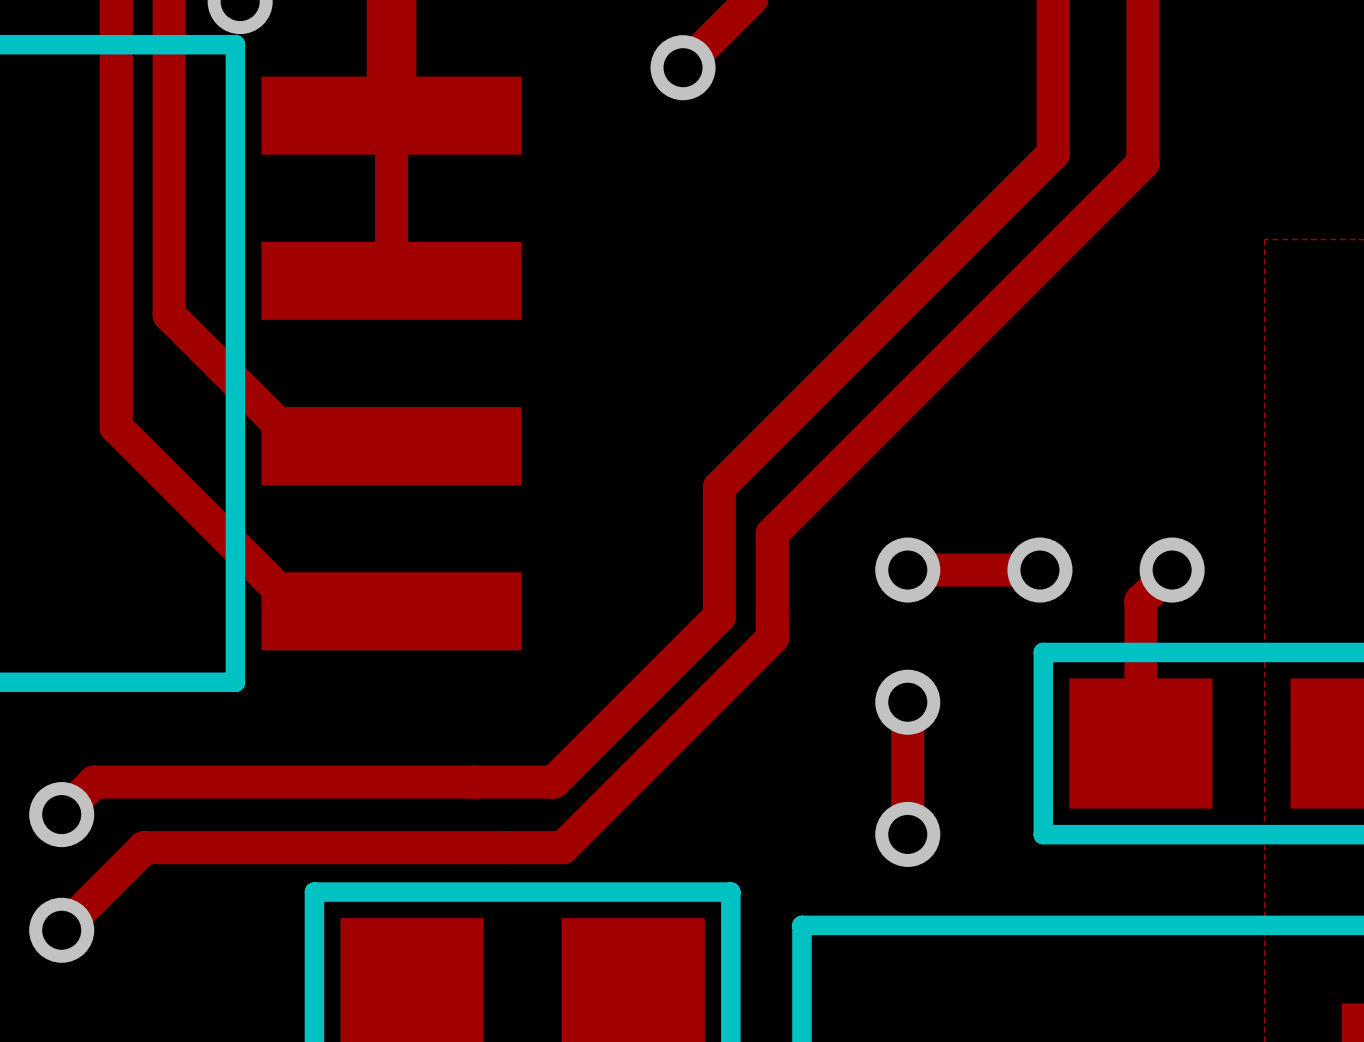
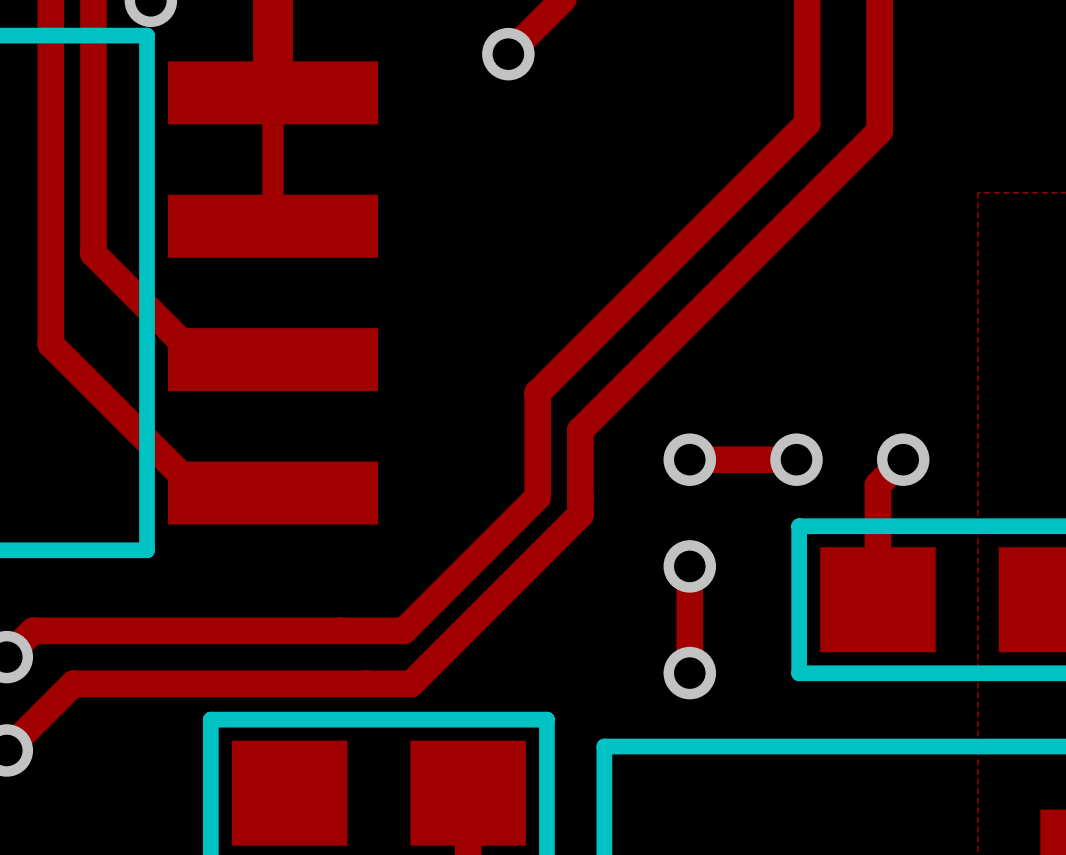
track width: thick (391, 115) (391, 280) -> thin (273, 92) (273, 226)

